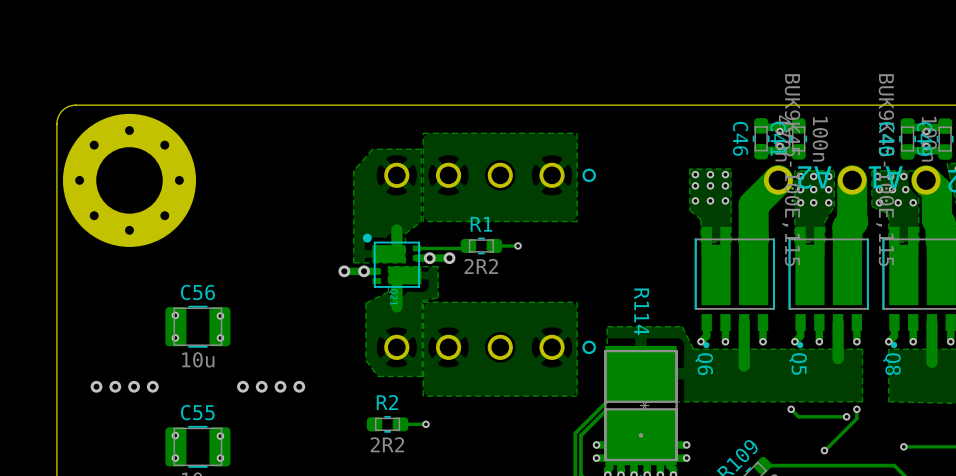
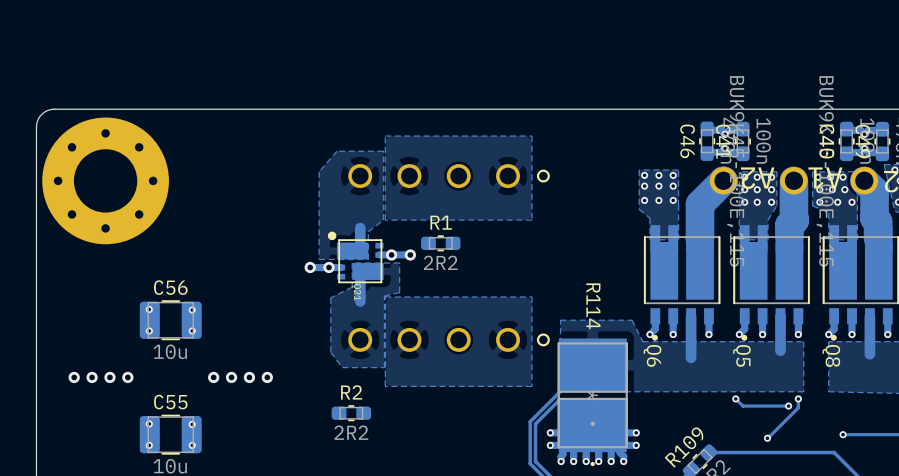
track: (468, 245) (465, 248) (417, 248) -> none
track: (518, 245) (494, 245) -> none
via: (518, 245) -> none
track: (426, 424) (400, 424) -> none
via: (426, 424) -> none

